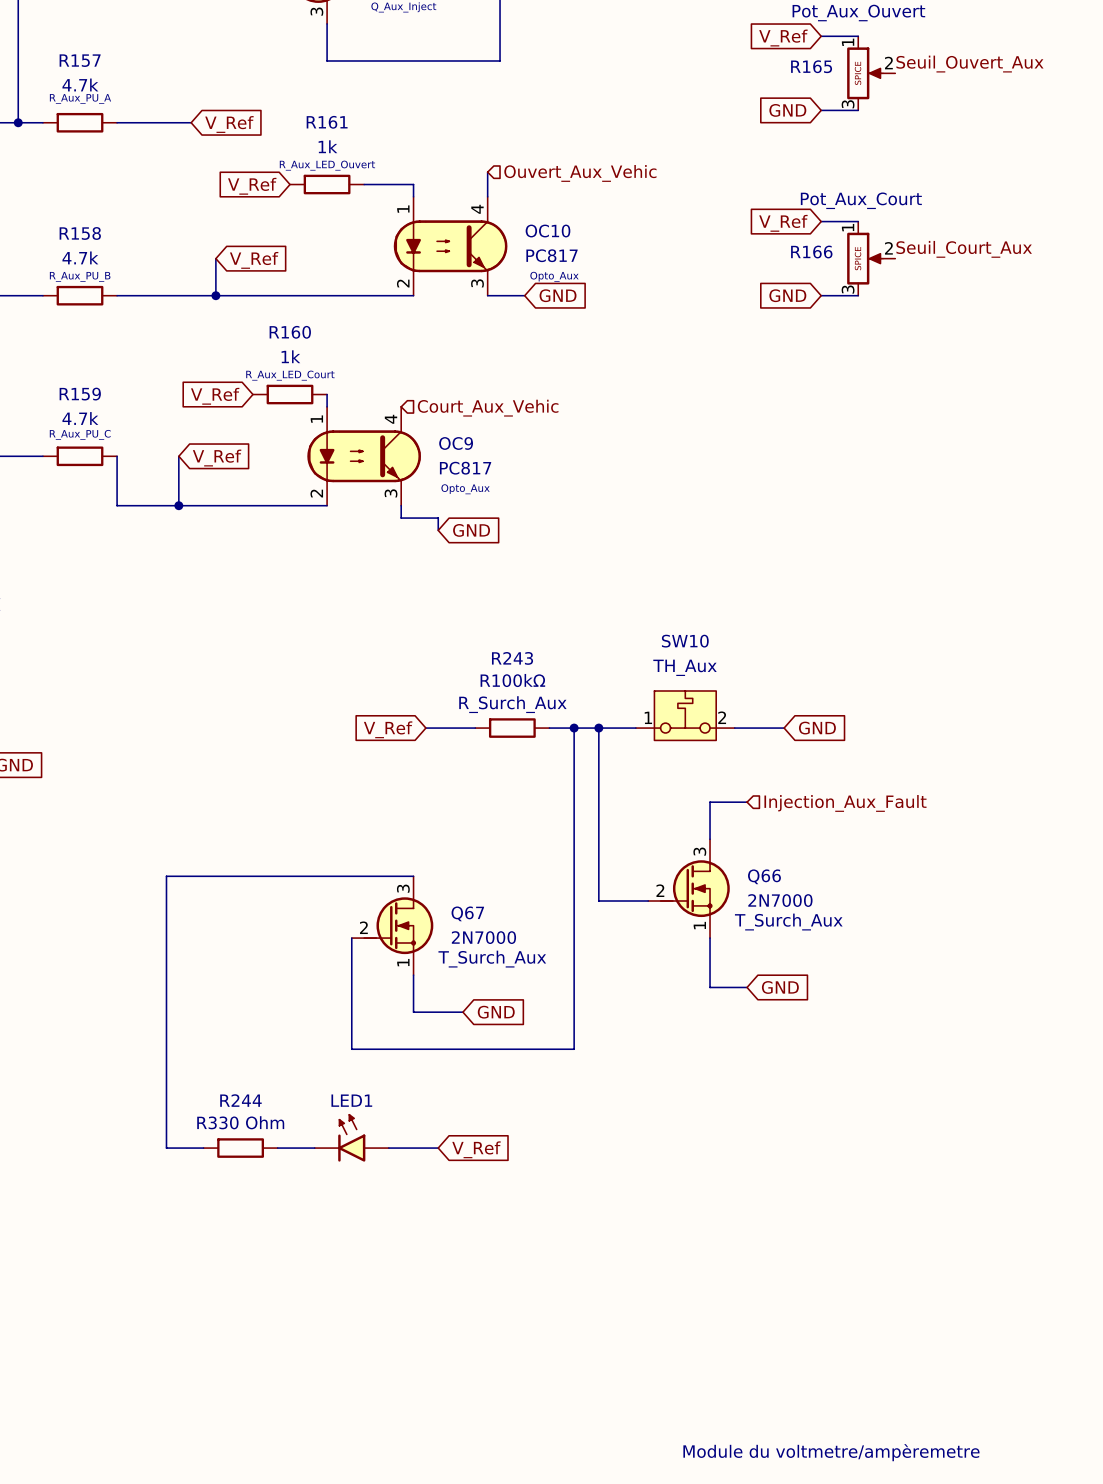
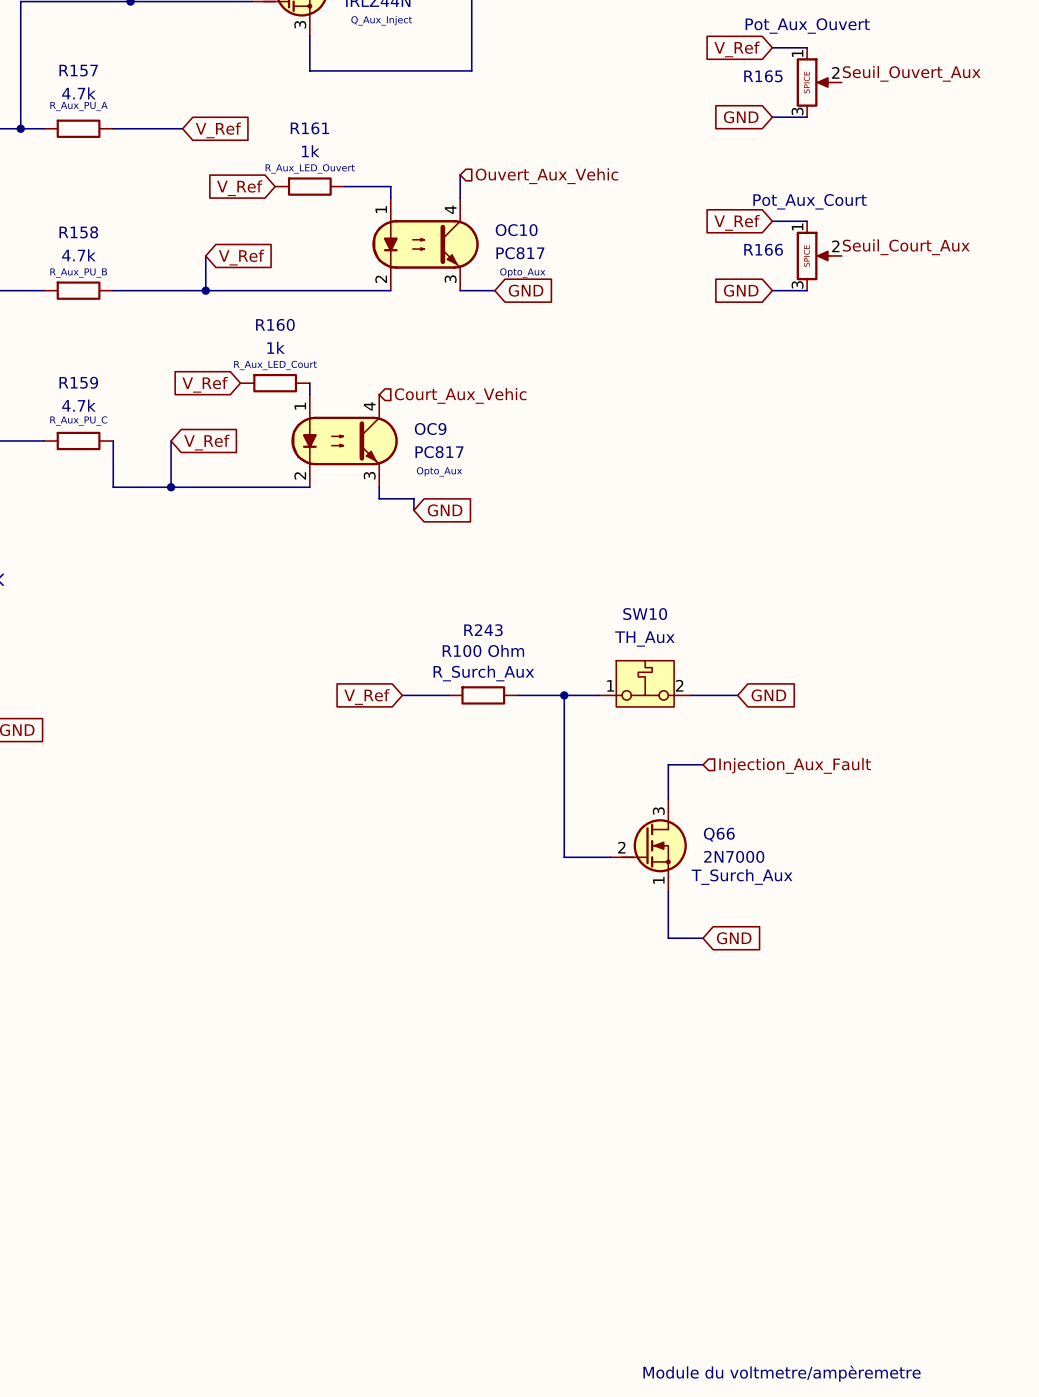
R243 value: R100kΩ (512, 680) -> R100 Ohm (483, 650)
wire: (574, 728) (574, 1049) (351, 1049) (351, 938) -> none
junction: (574, 728) -> none
wire: (413, 876) (166, 876) (166, 1148) (203, 1148) -> none
Q67: 2N7000 (392, 925) -> none
wire: (413, 975) (413, 1012) (462, 1012) -> none
global label: GND (496, 1012) -> none
LED1: (351, 1137) -> none
R244: R330 Ohm (240, 1148) -> none
wire: (277, 1148) (314, 1148) -> none
wire: (388, 1148) (438, 1148) -> none
global label: V_Ref (476, 1149) -> none

